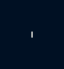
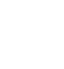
board edge: (32, 32) (32, 37) -> none

